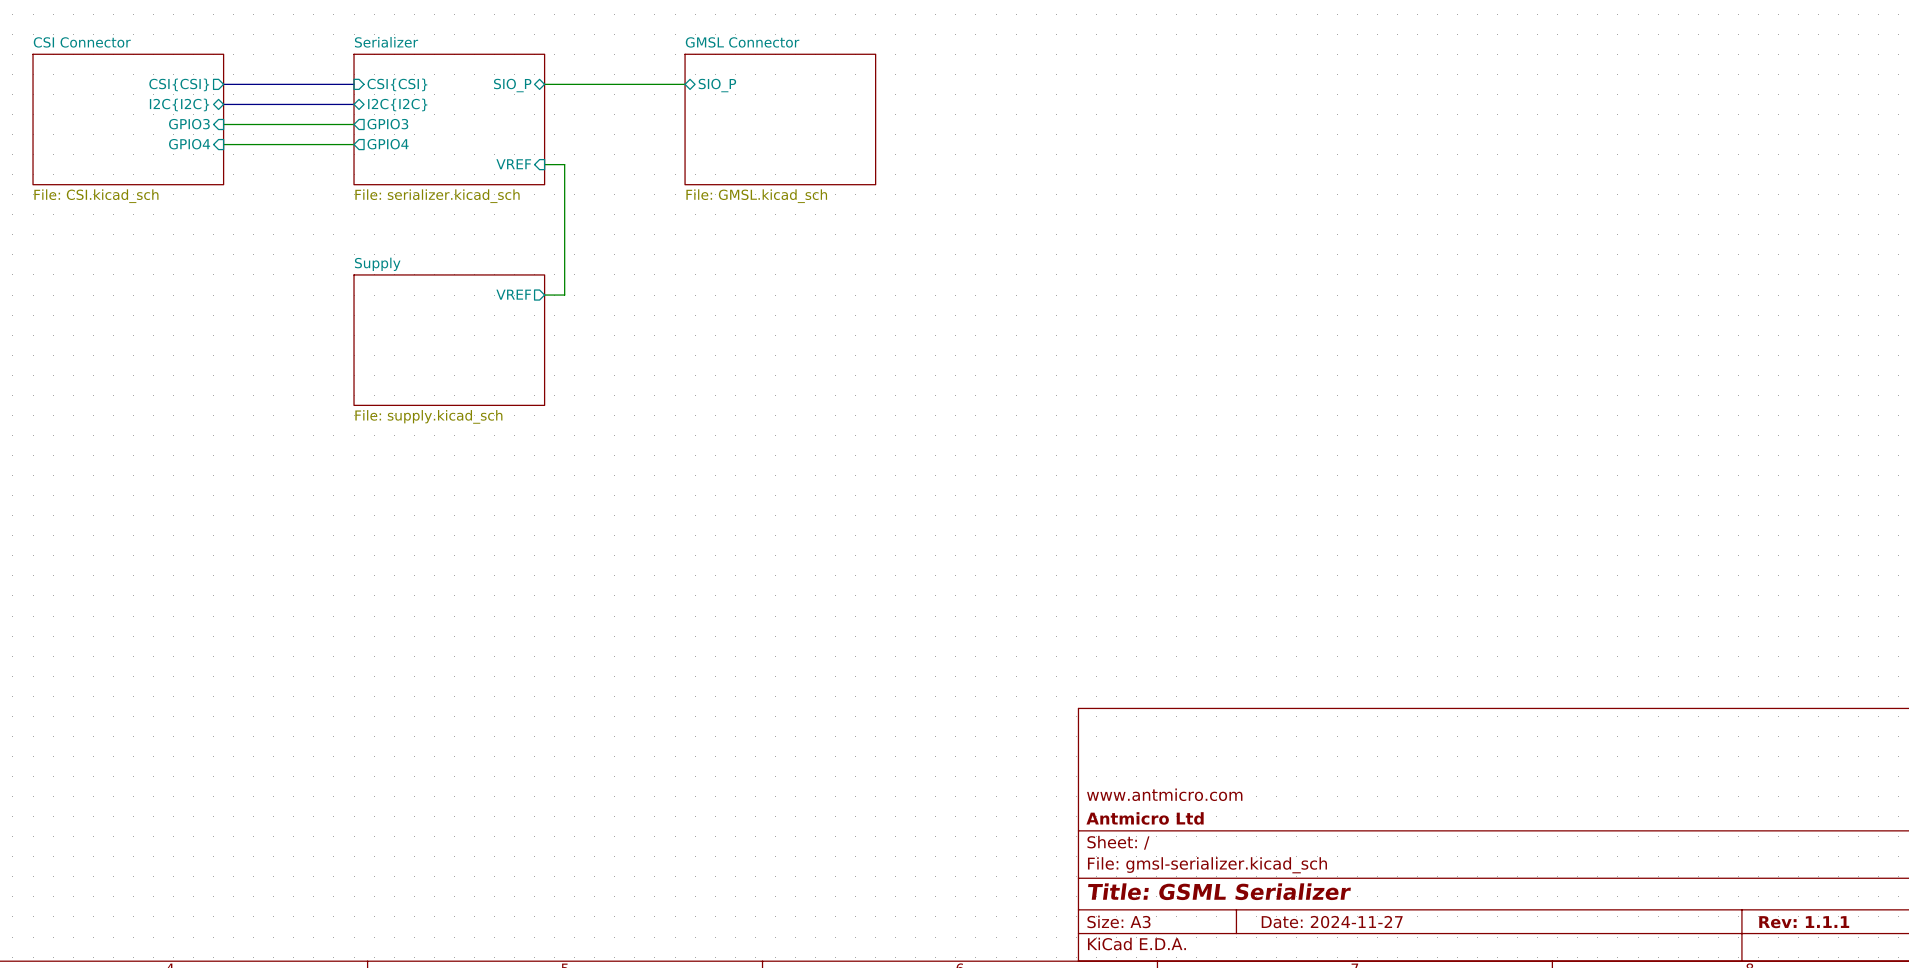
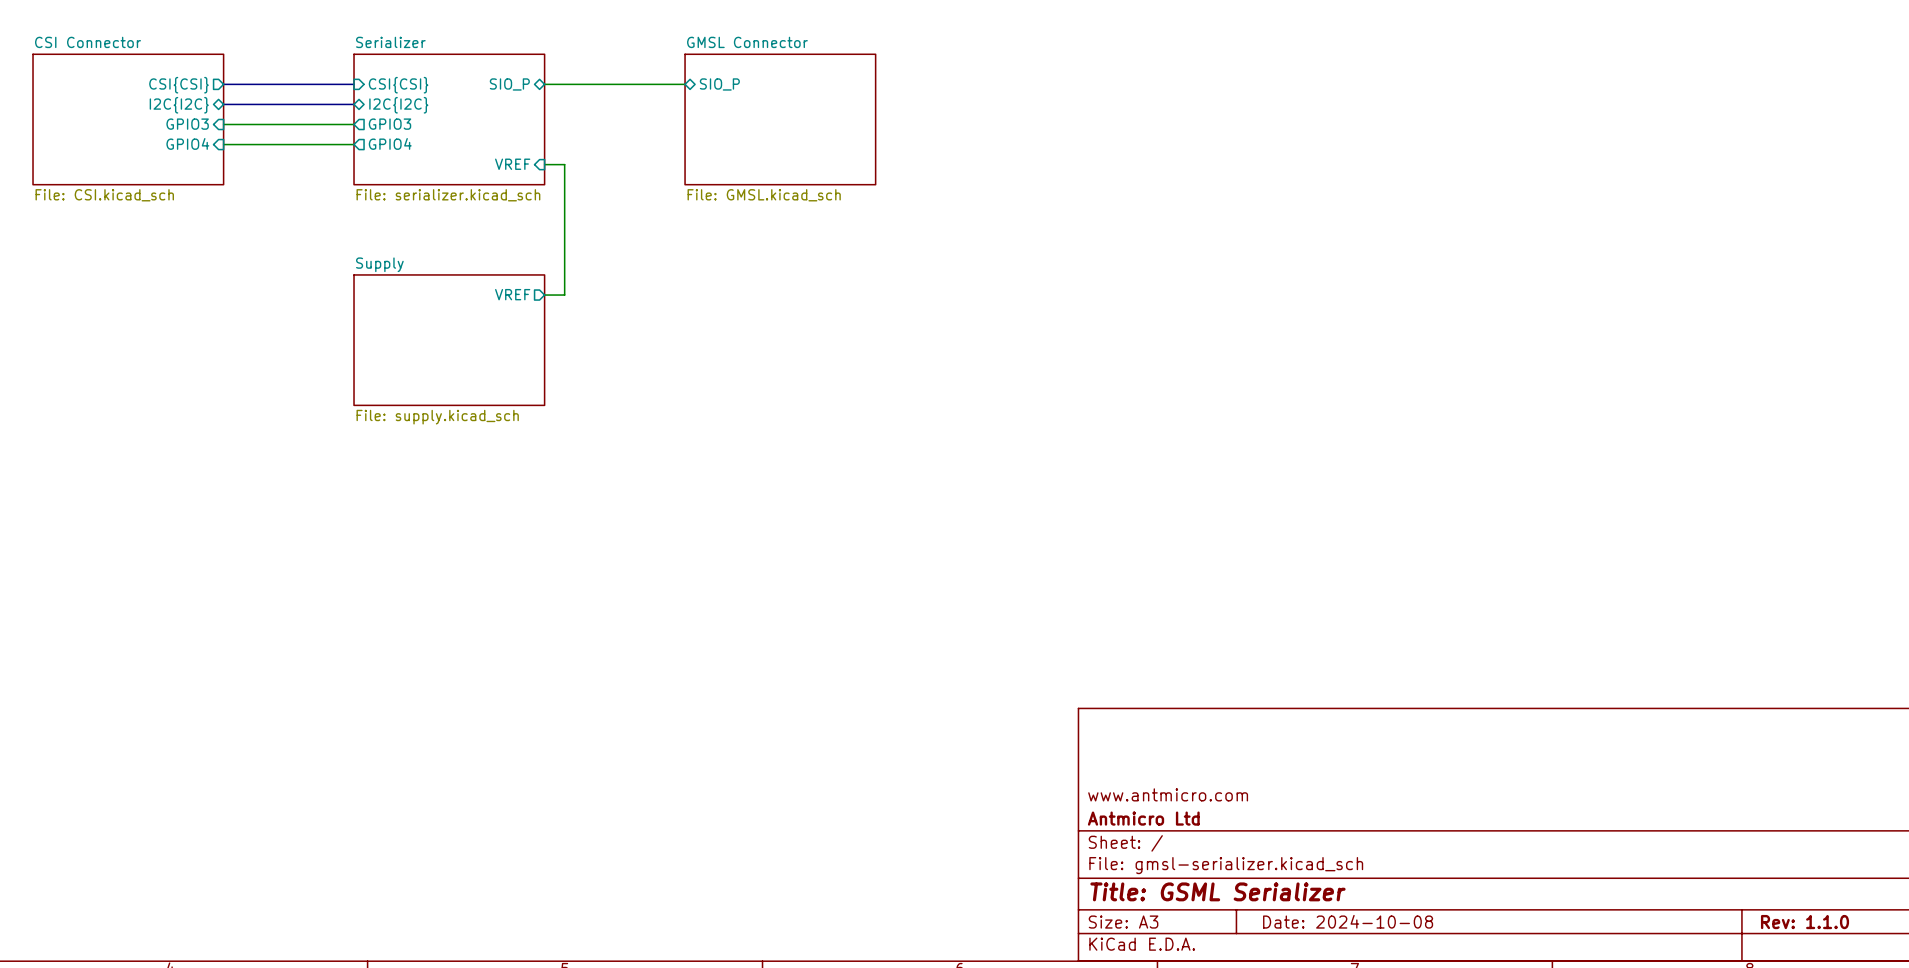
title block: Date: 2024-11-27 (1332, 922) -> Date: 2024-10-08 (1348, 921)
title block: Rev: 1.1.1 (1804, 922) -> Rev: 1.1.0 (1805, 922)

